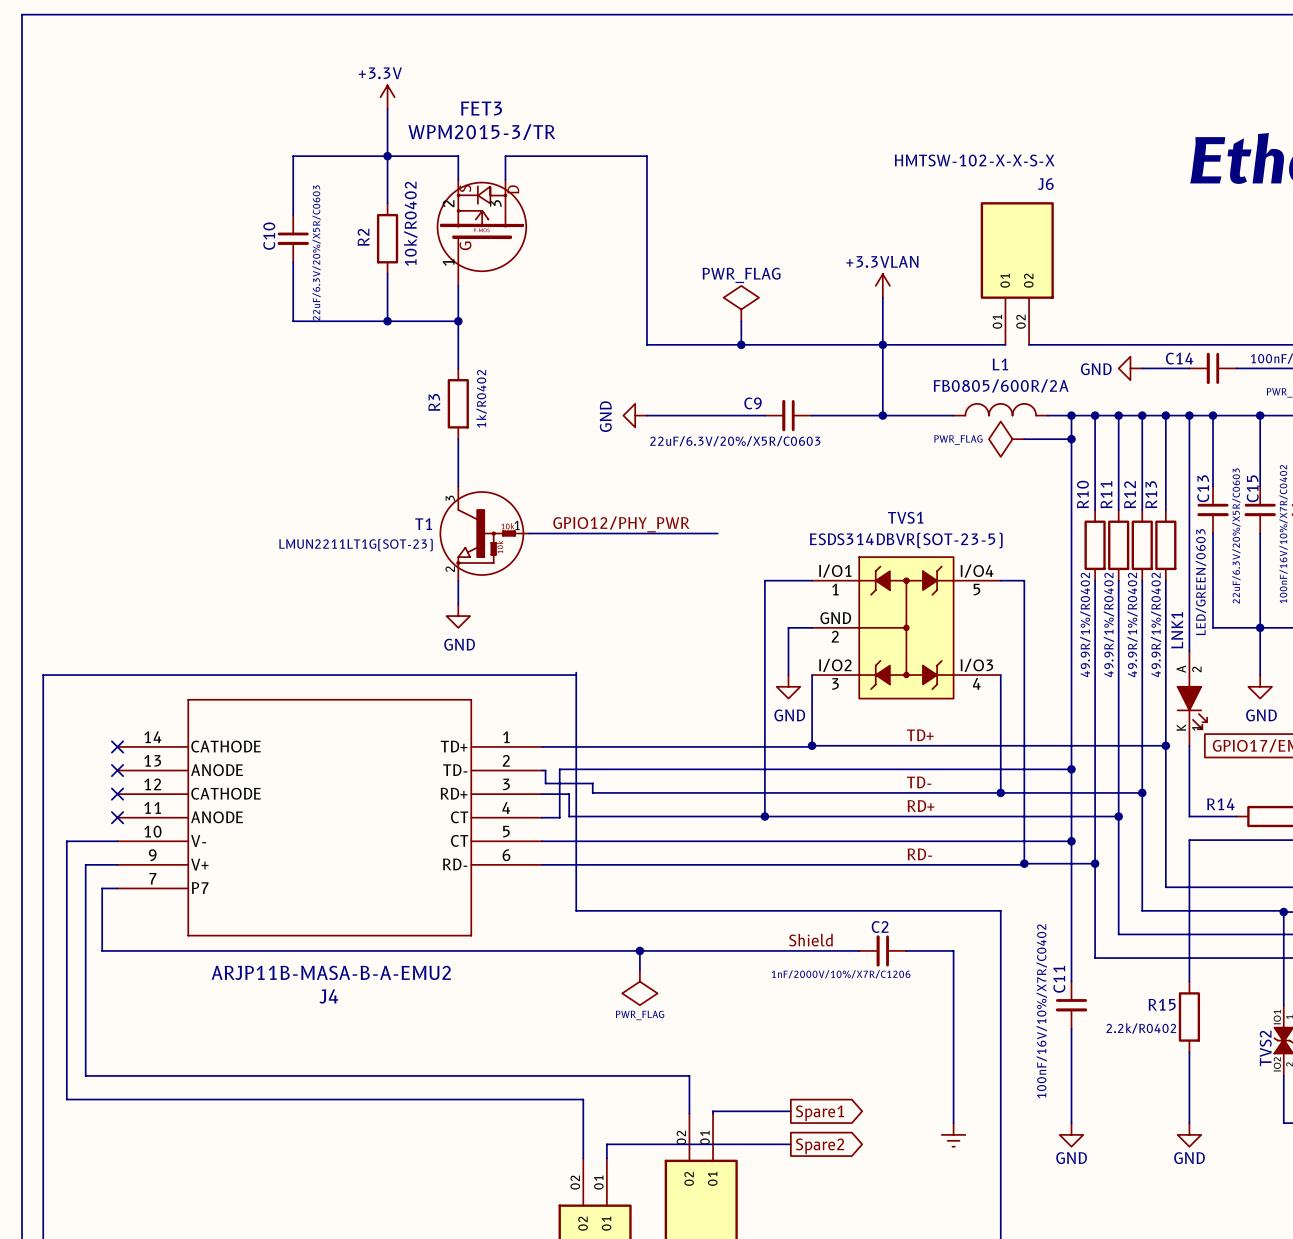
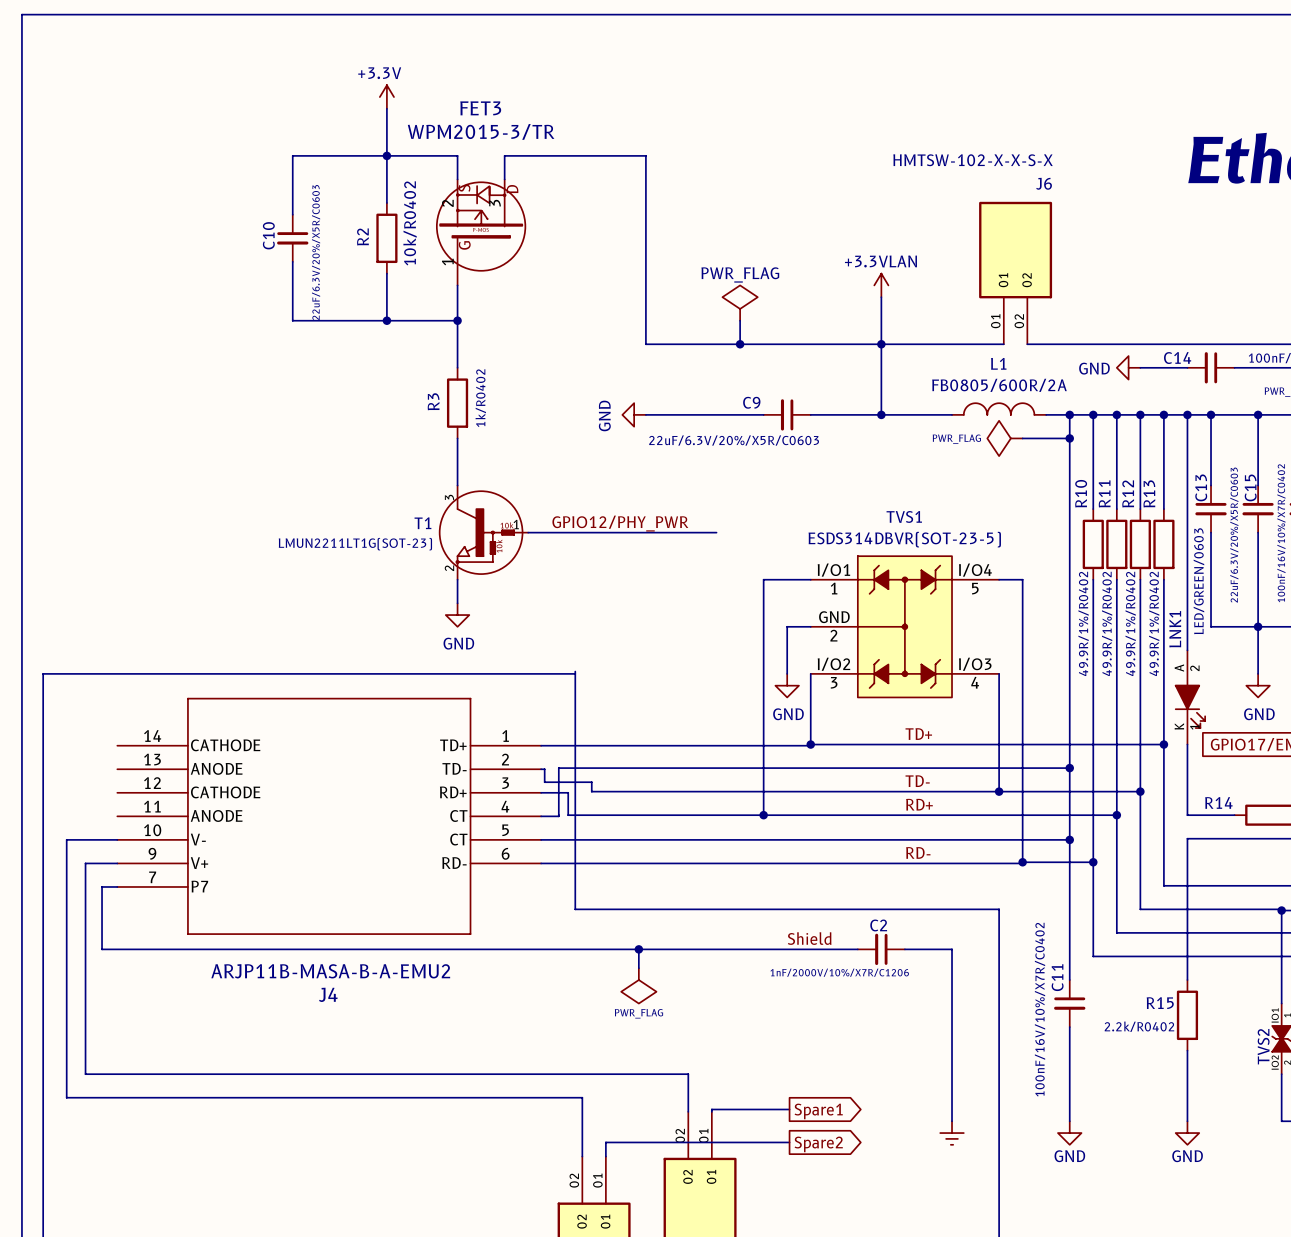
no-connect mark: (117, 746) -> none
no-connect mark: (117, 770) -> none
no-connect mark: (117, 794) -> none
no-connect mark: (117, 817) -> none

